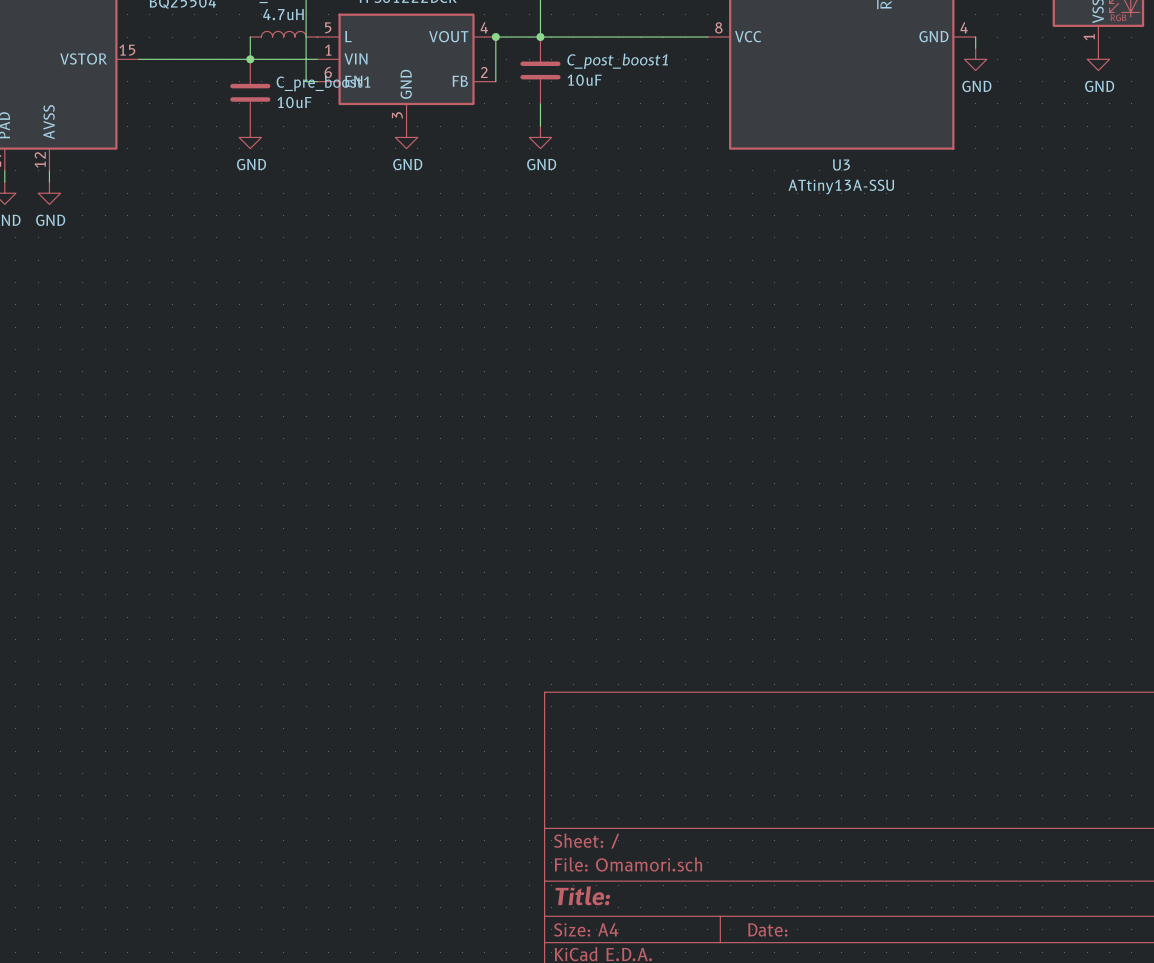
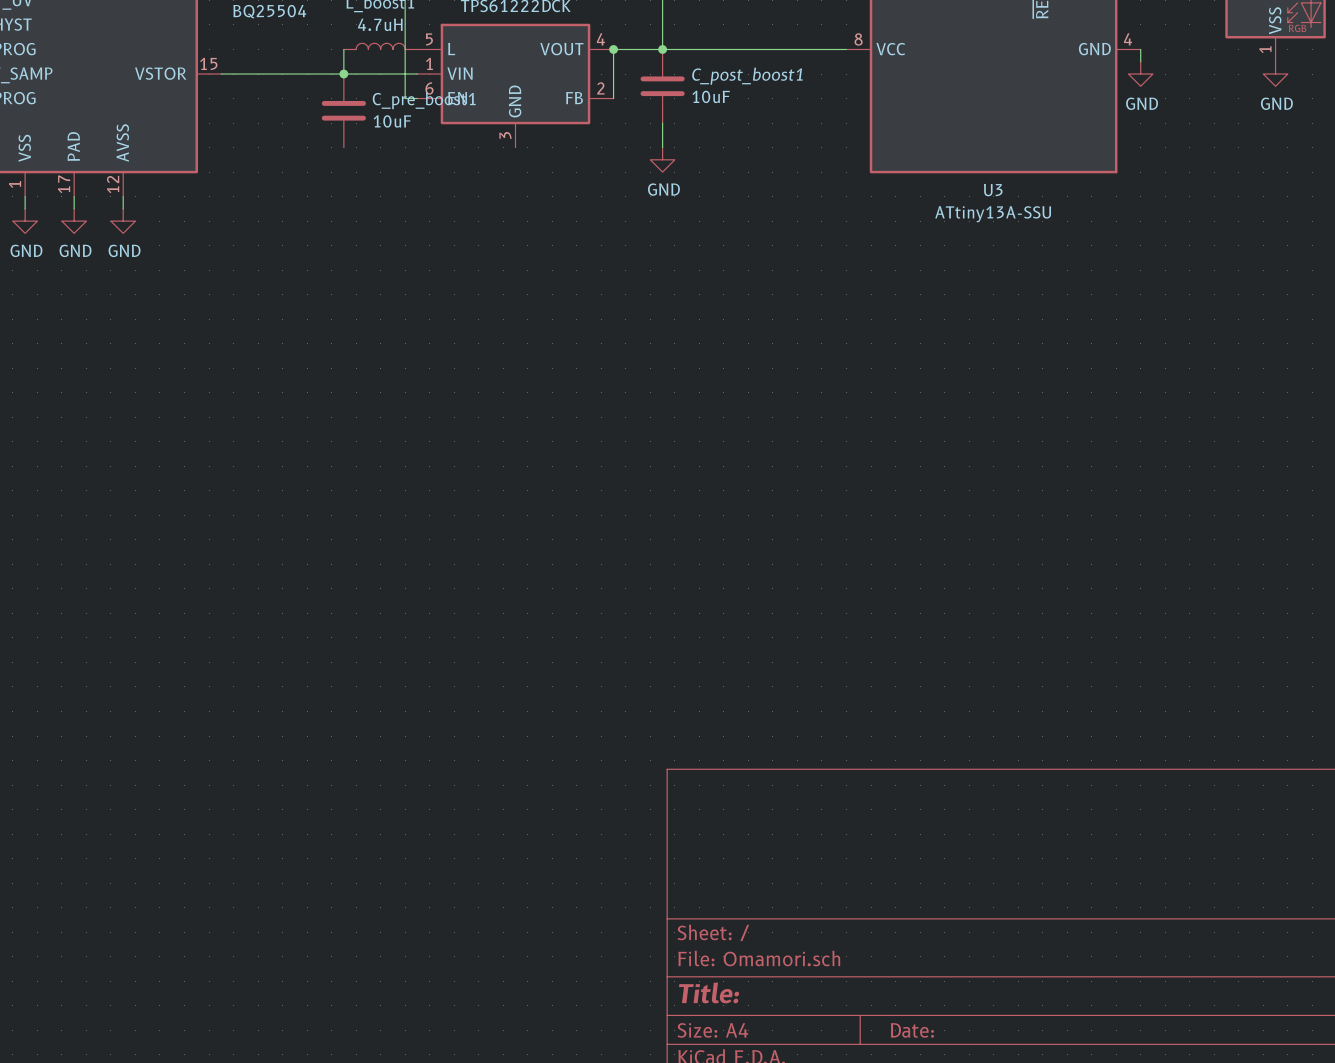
power symbol: GND (250, 137) -> none
power symbol: GND (406, 137) -> none

